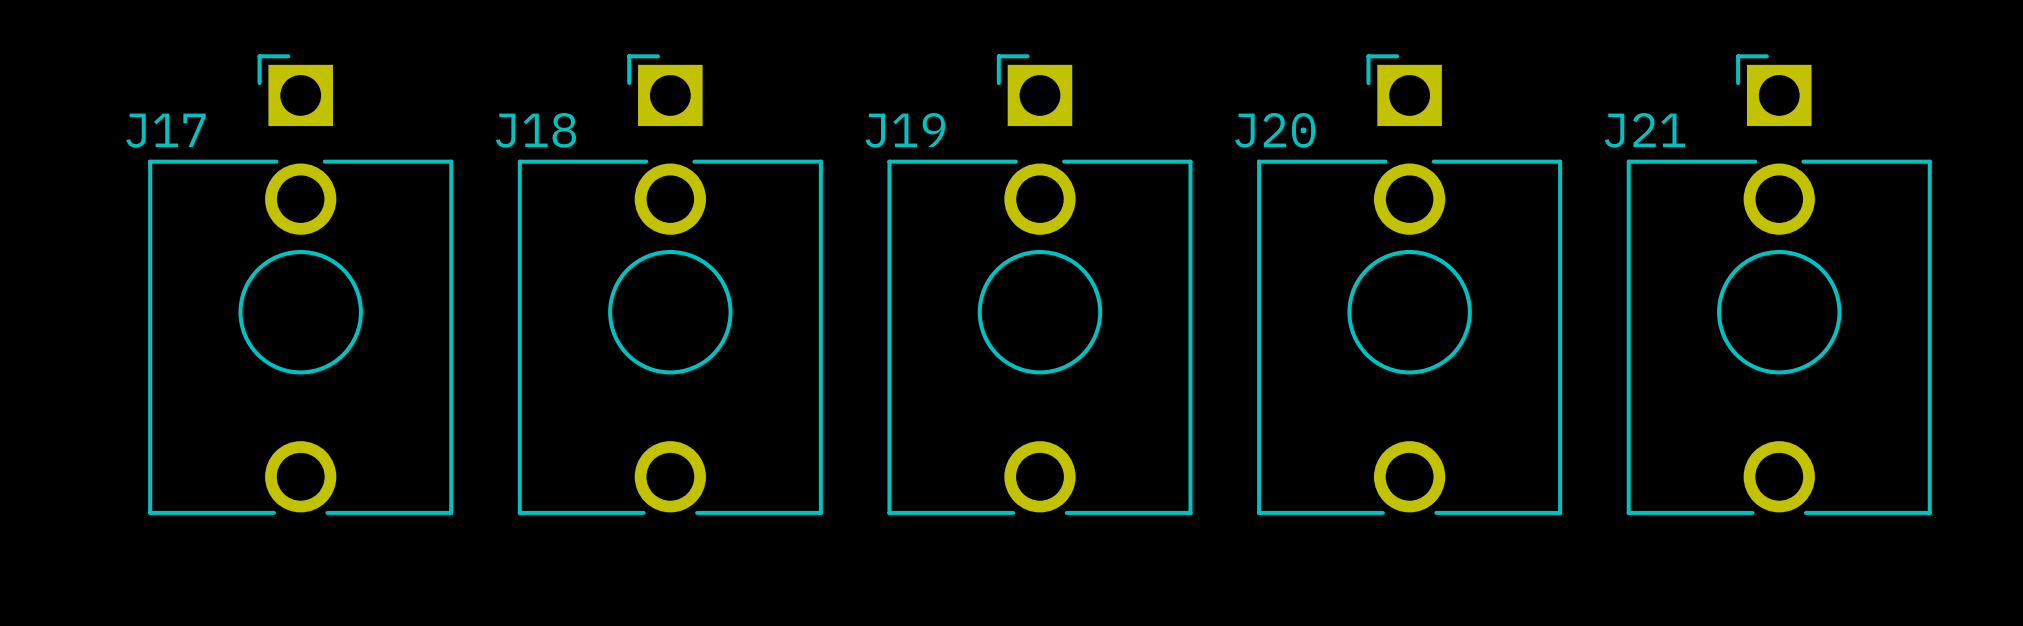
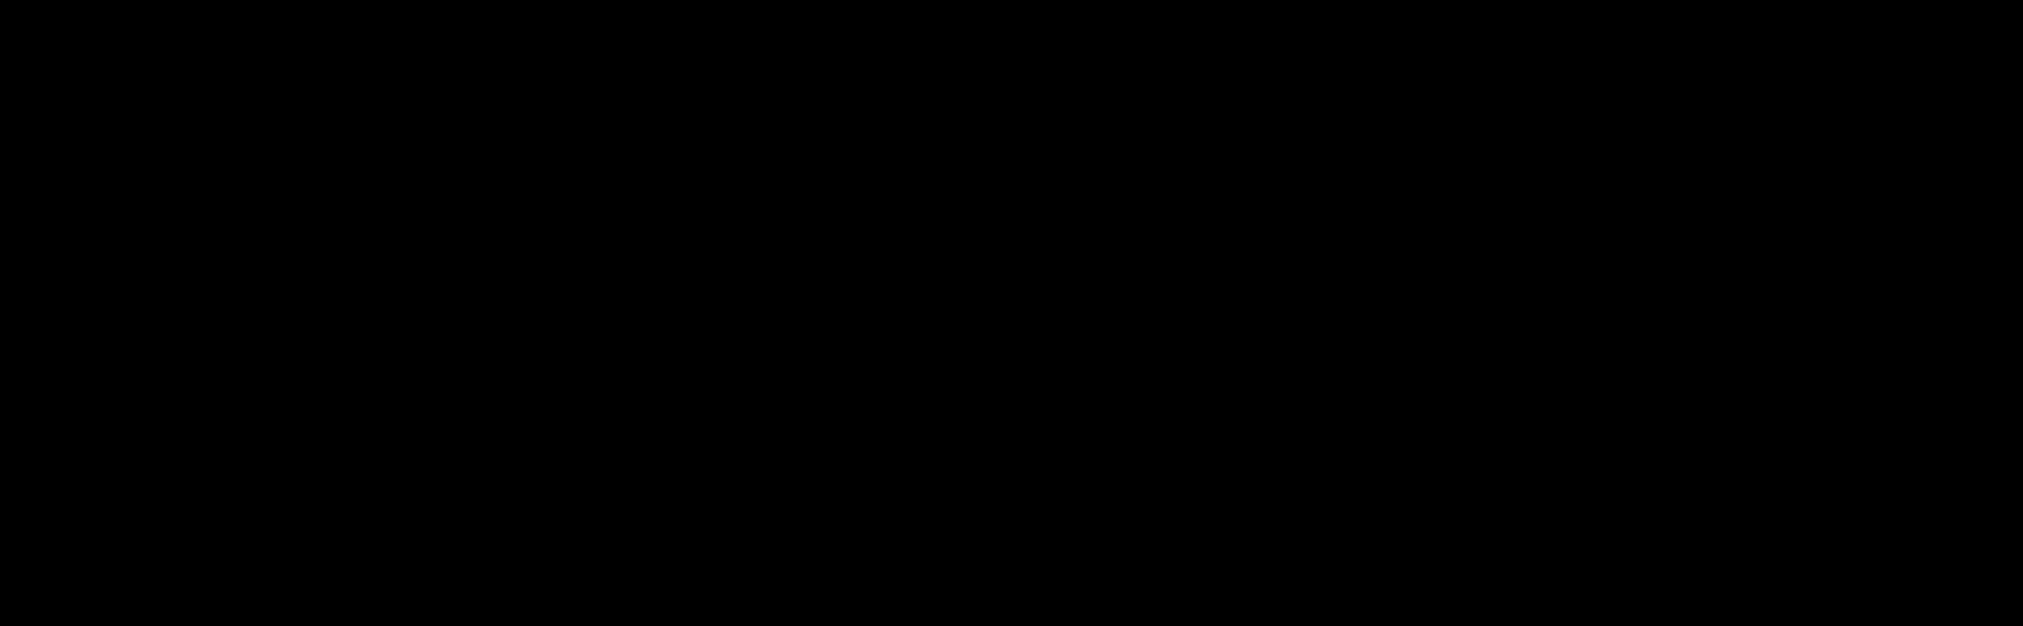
J17: (300, 284) -> none
J18: (670, 284) -> none
J19: (1039, 284) -> none
J20: (1409, 284) -> none
J21: (1779, 284) -> none

